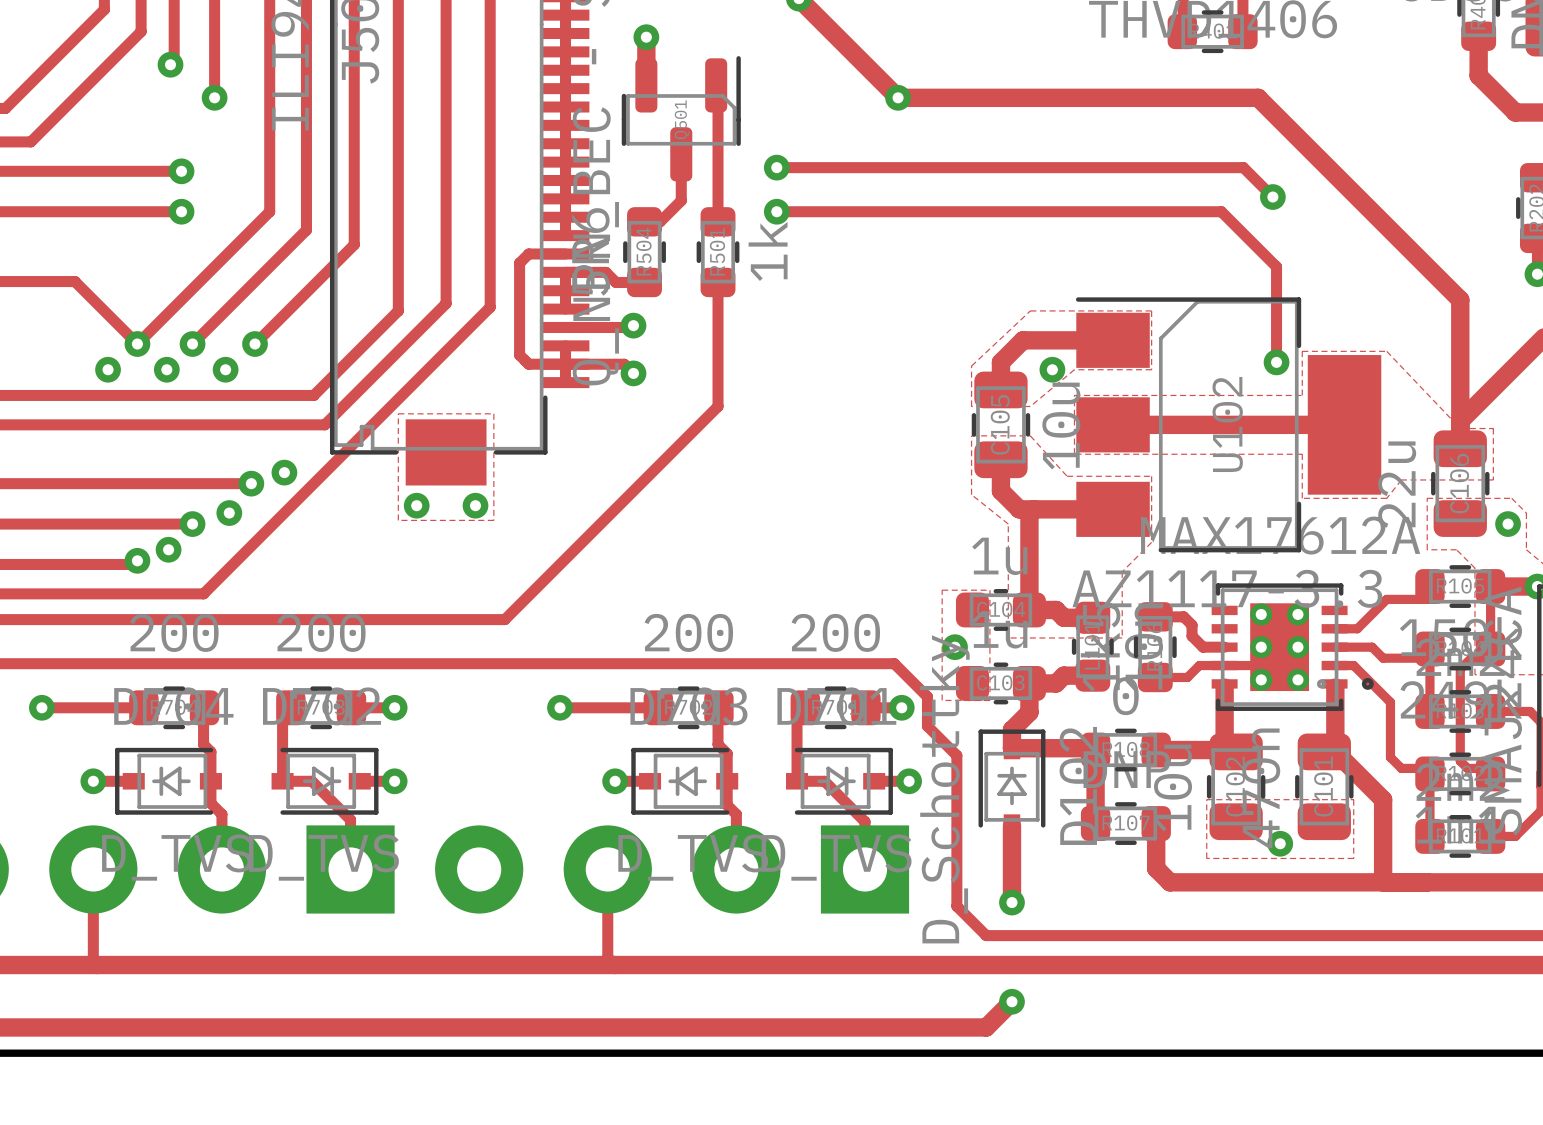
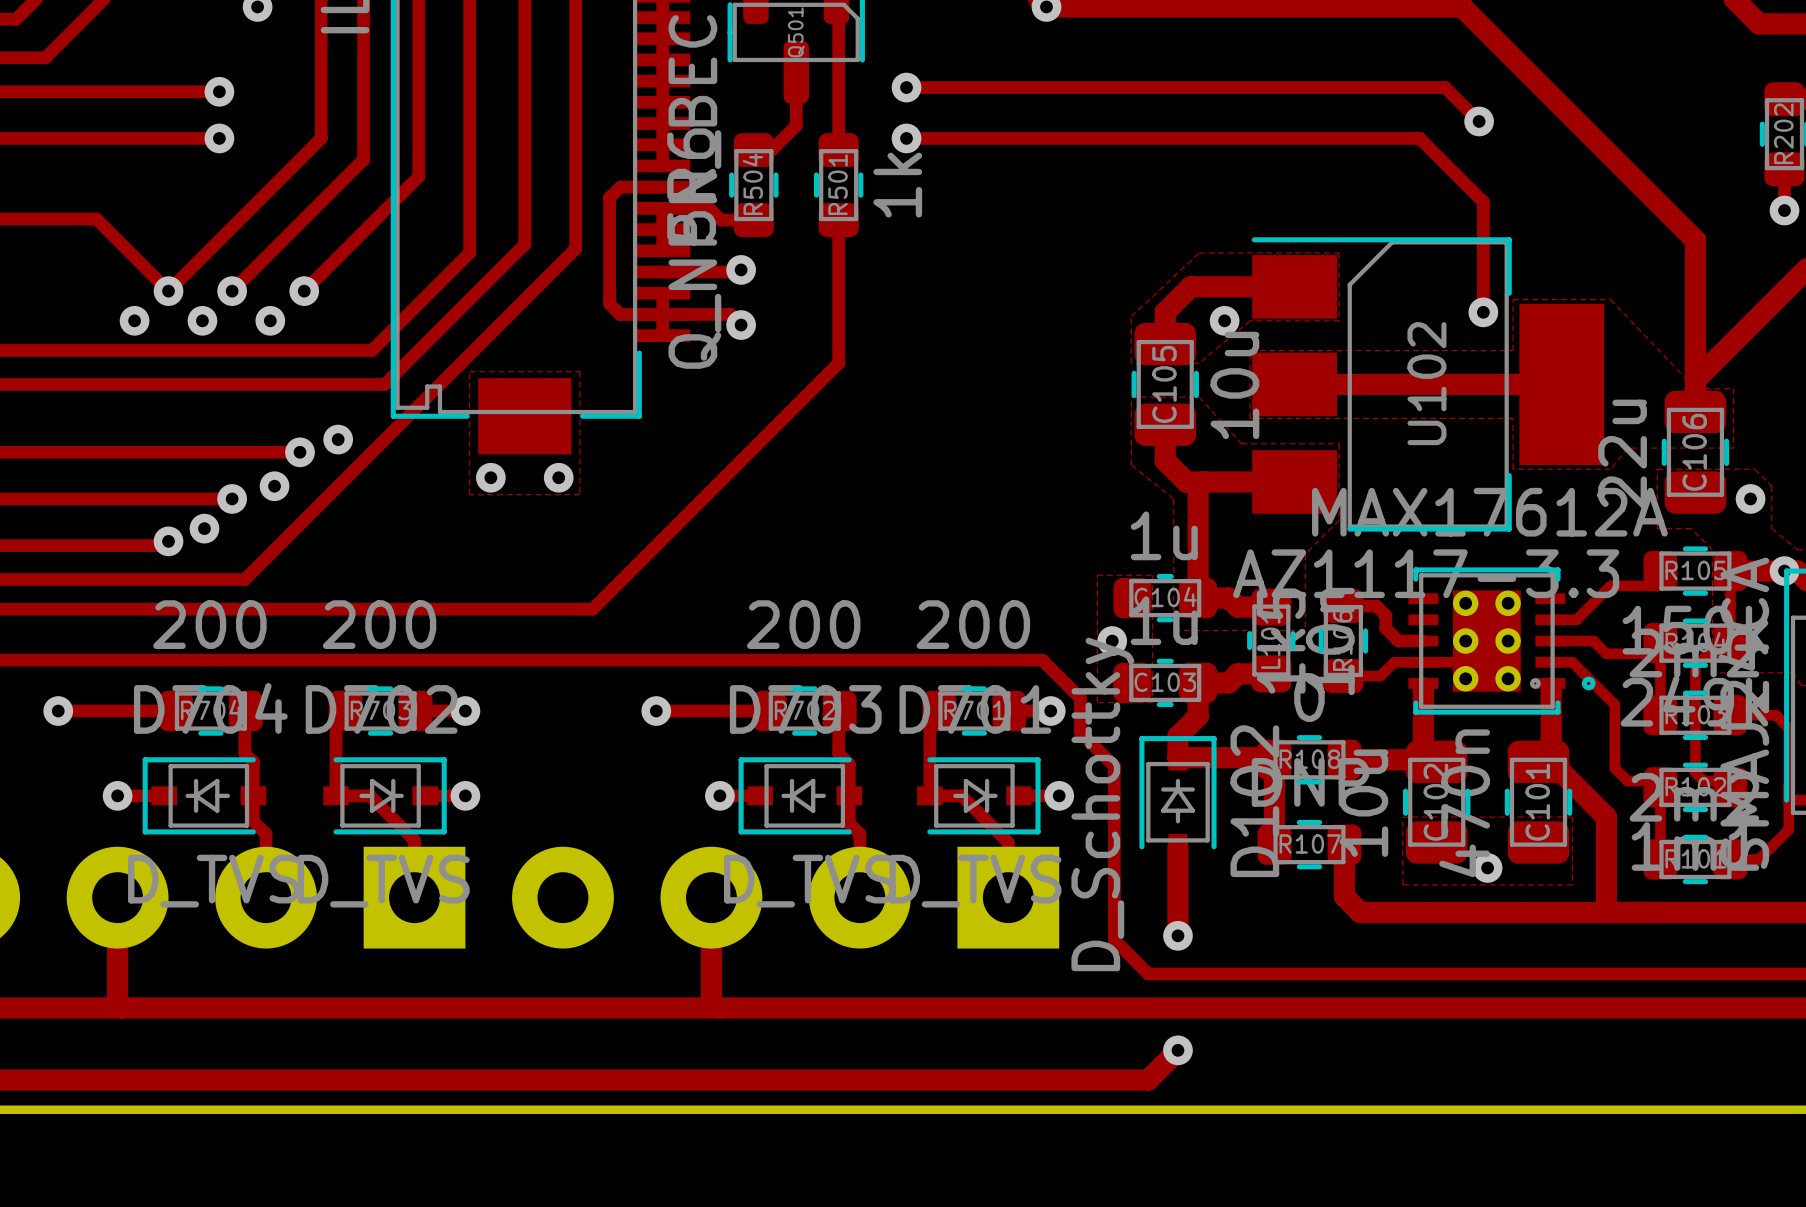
track width: thin (93, 869) (93, 961) -> thick (117, 897) (117, 1003)
track width: thin (607, 869) (607, 957) -> thick (711, 897) (711, 999)

